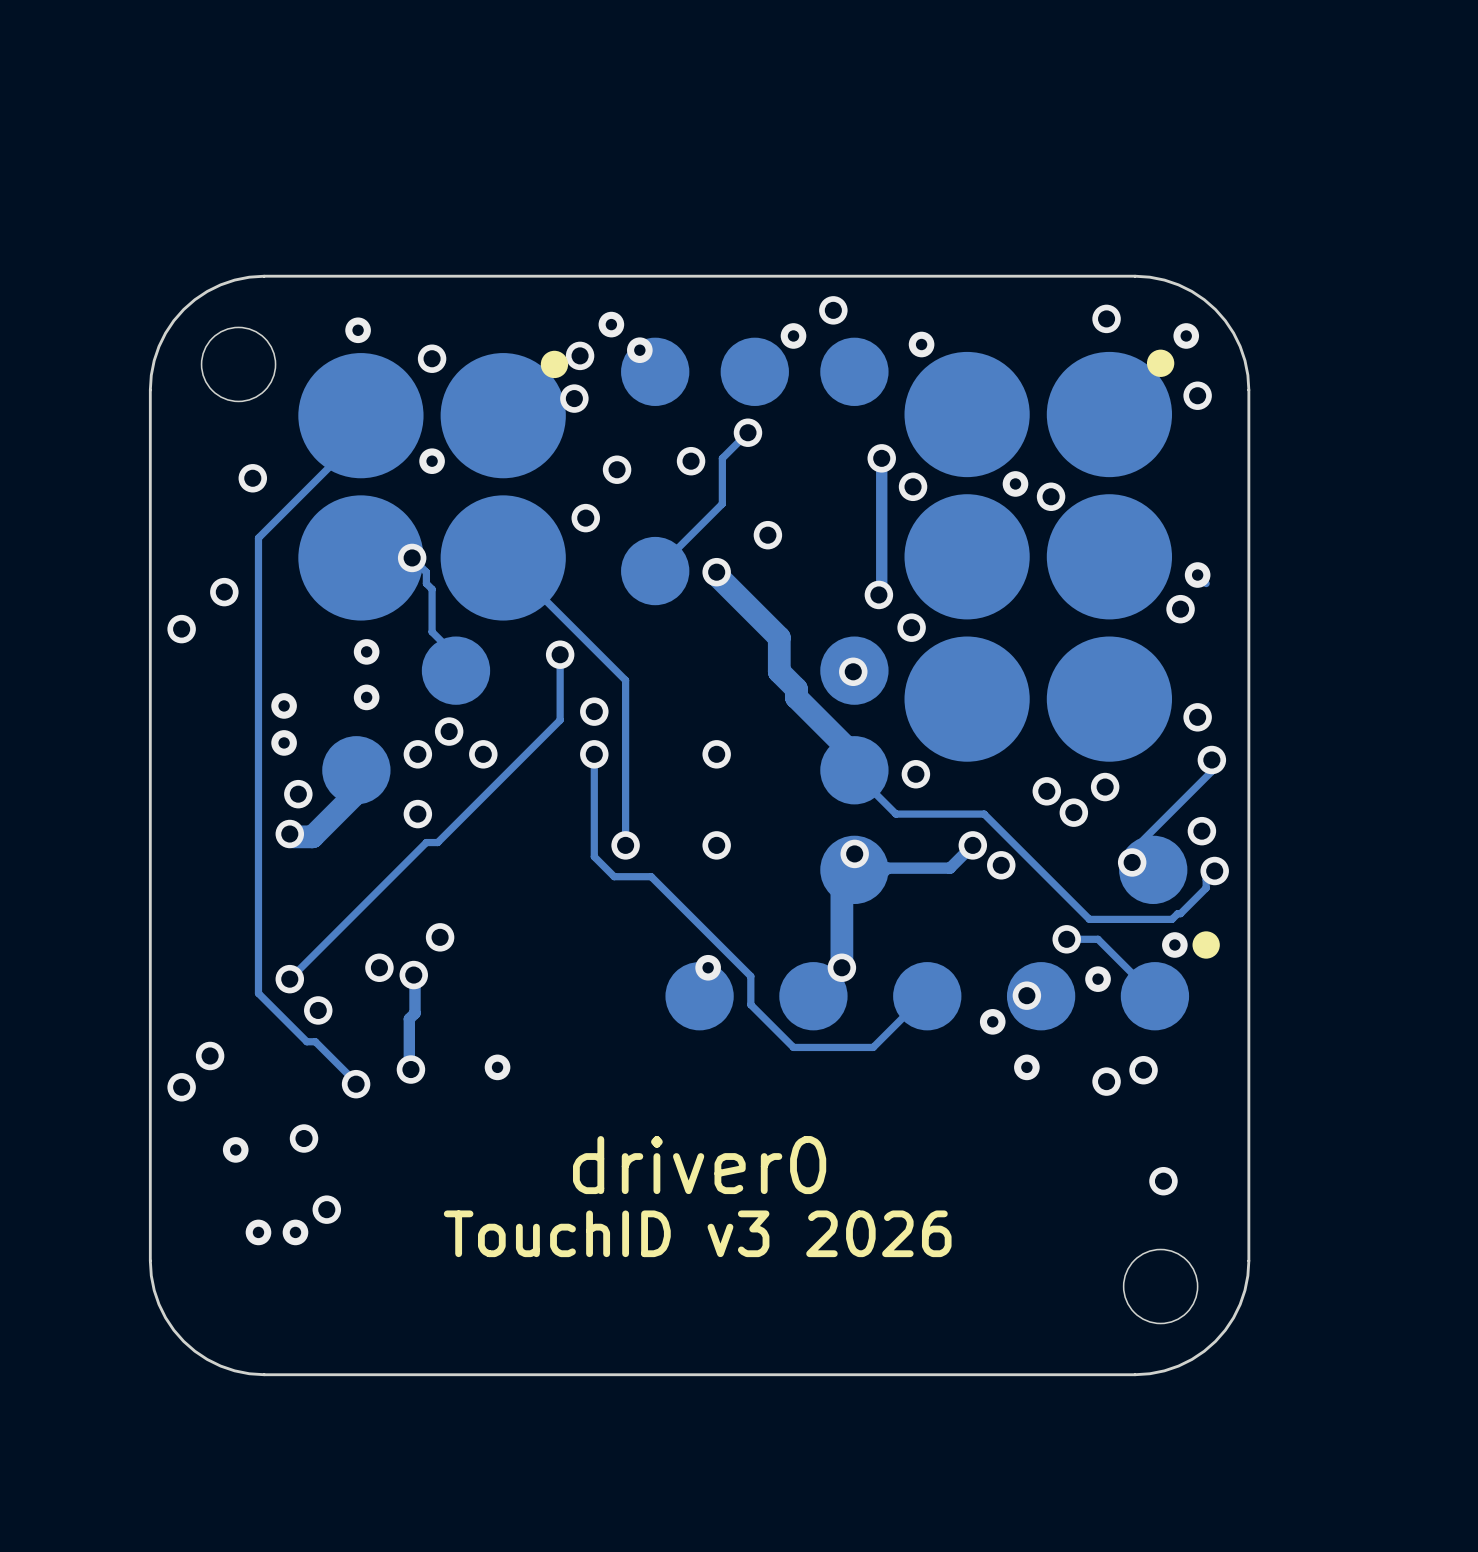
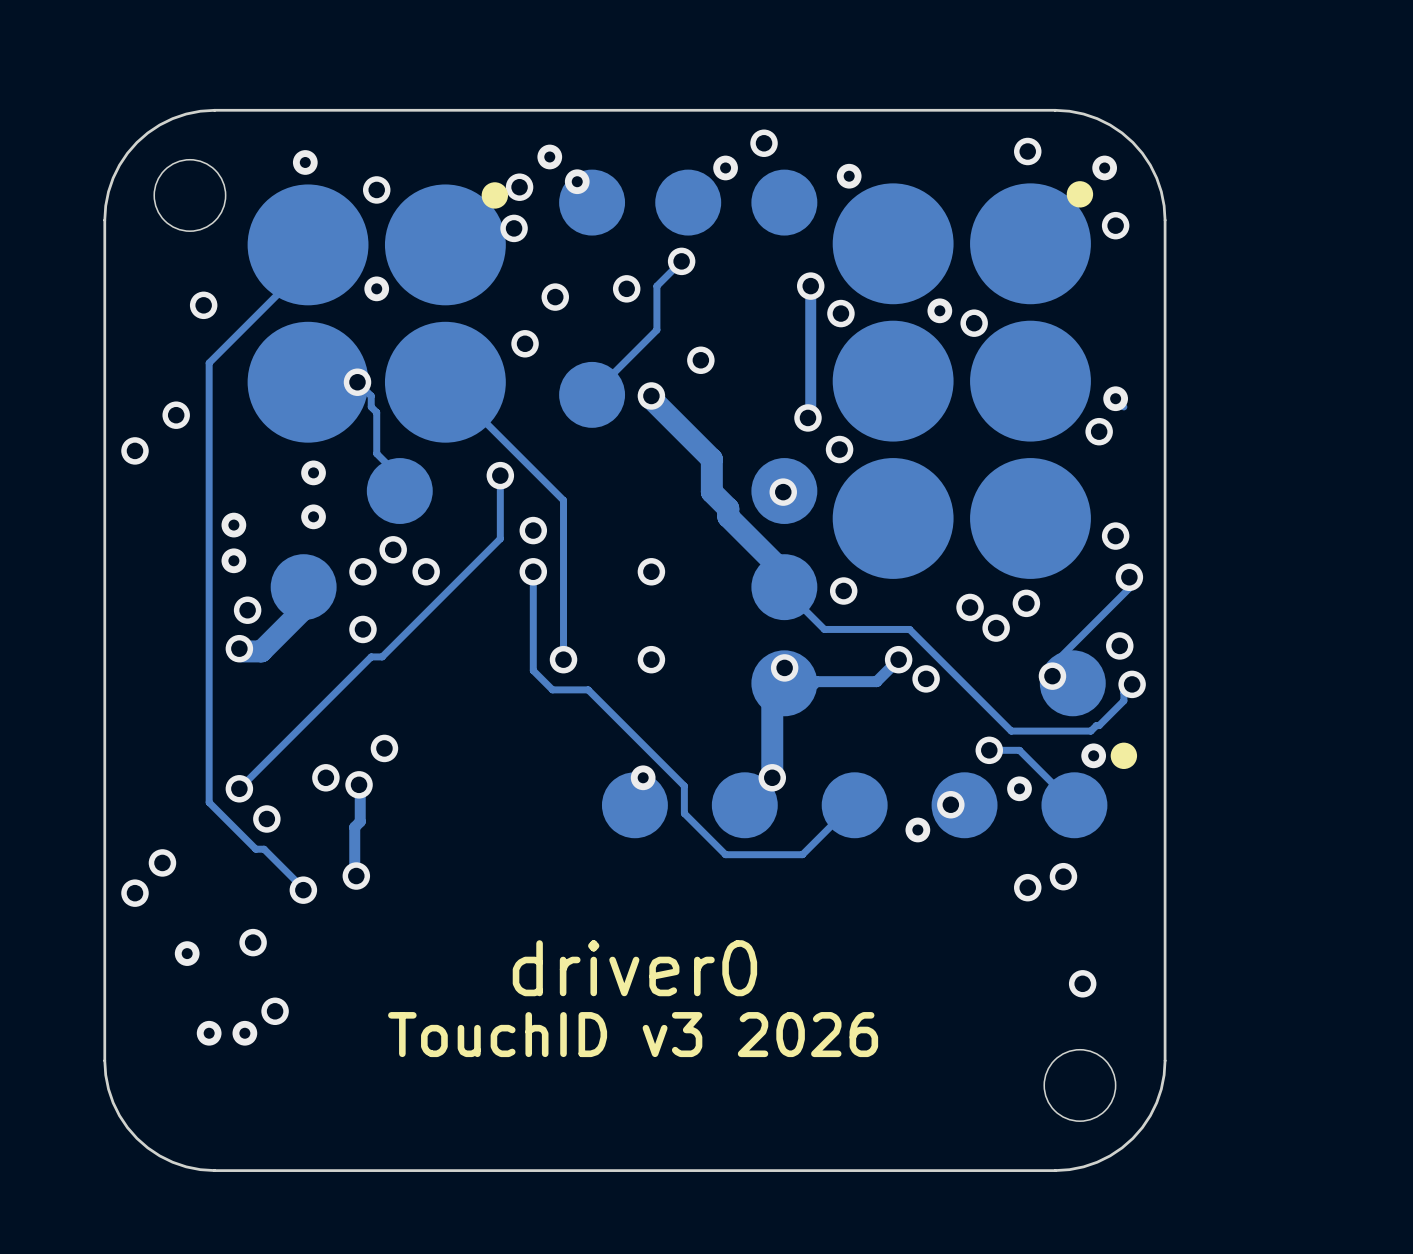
via: (497, 1067) -> none
via: (1026, 1067) -> none

